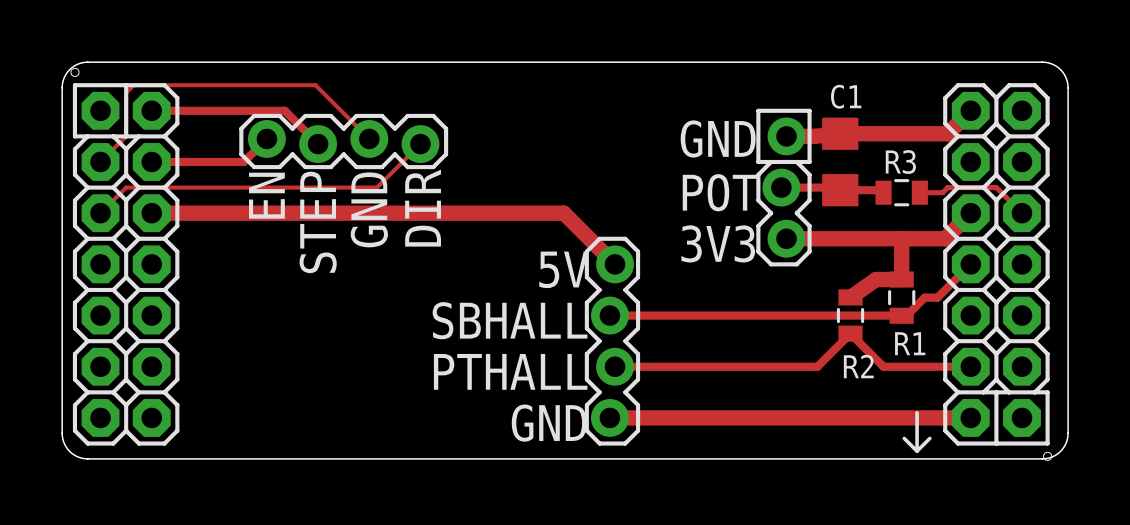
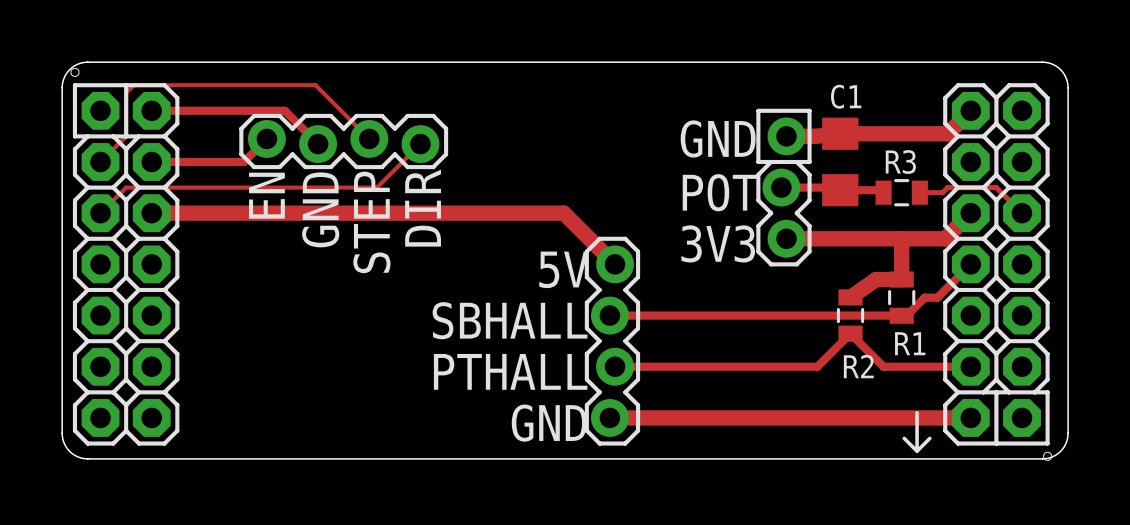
text position: GND (369, 209) -> GND (320, 209)
text position: STEP (318, 222) -> STEP (371, 222)

